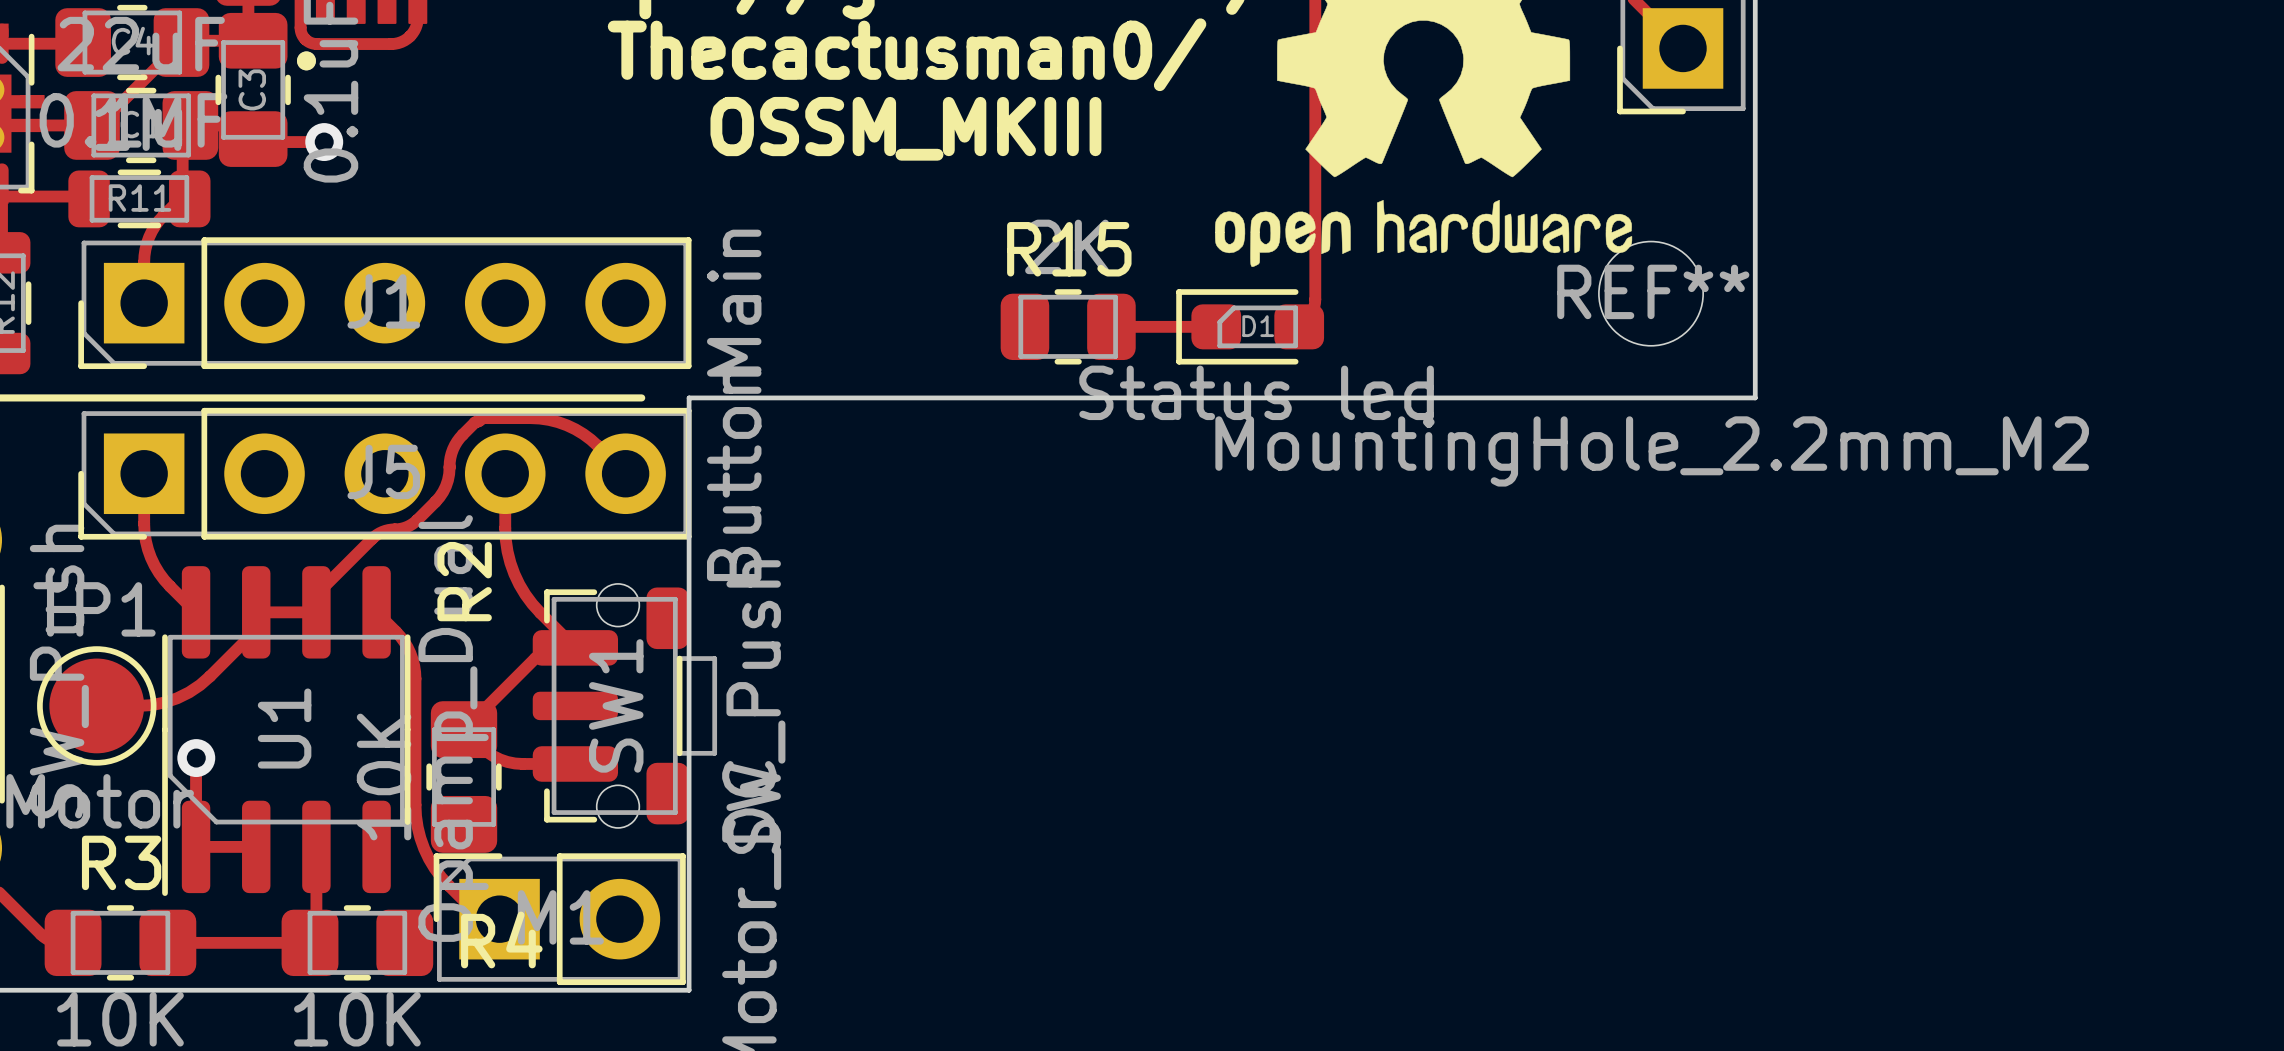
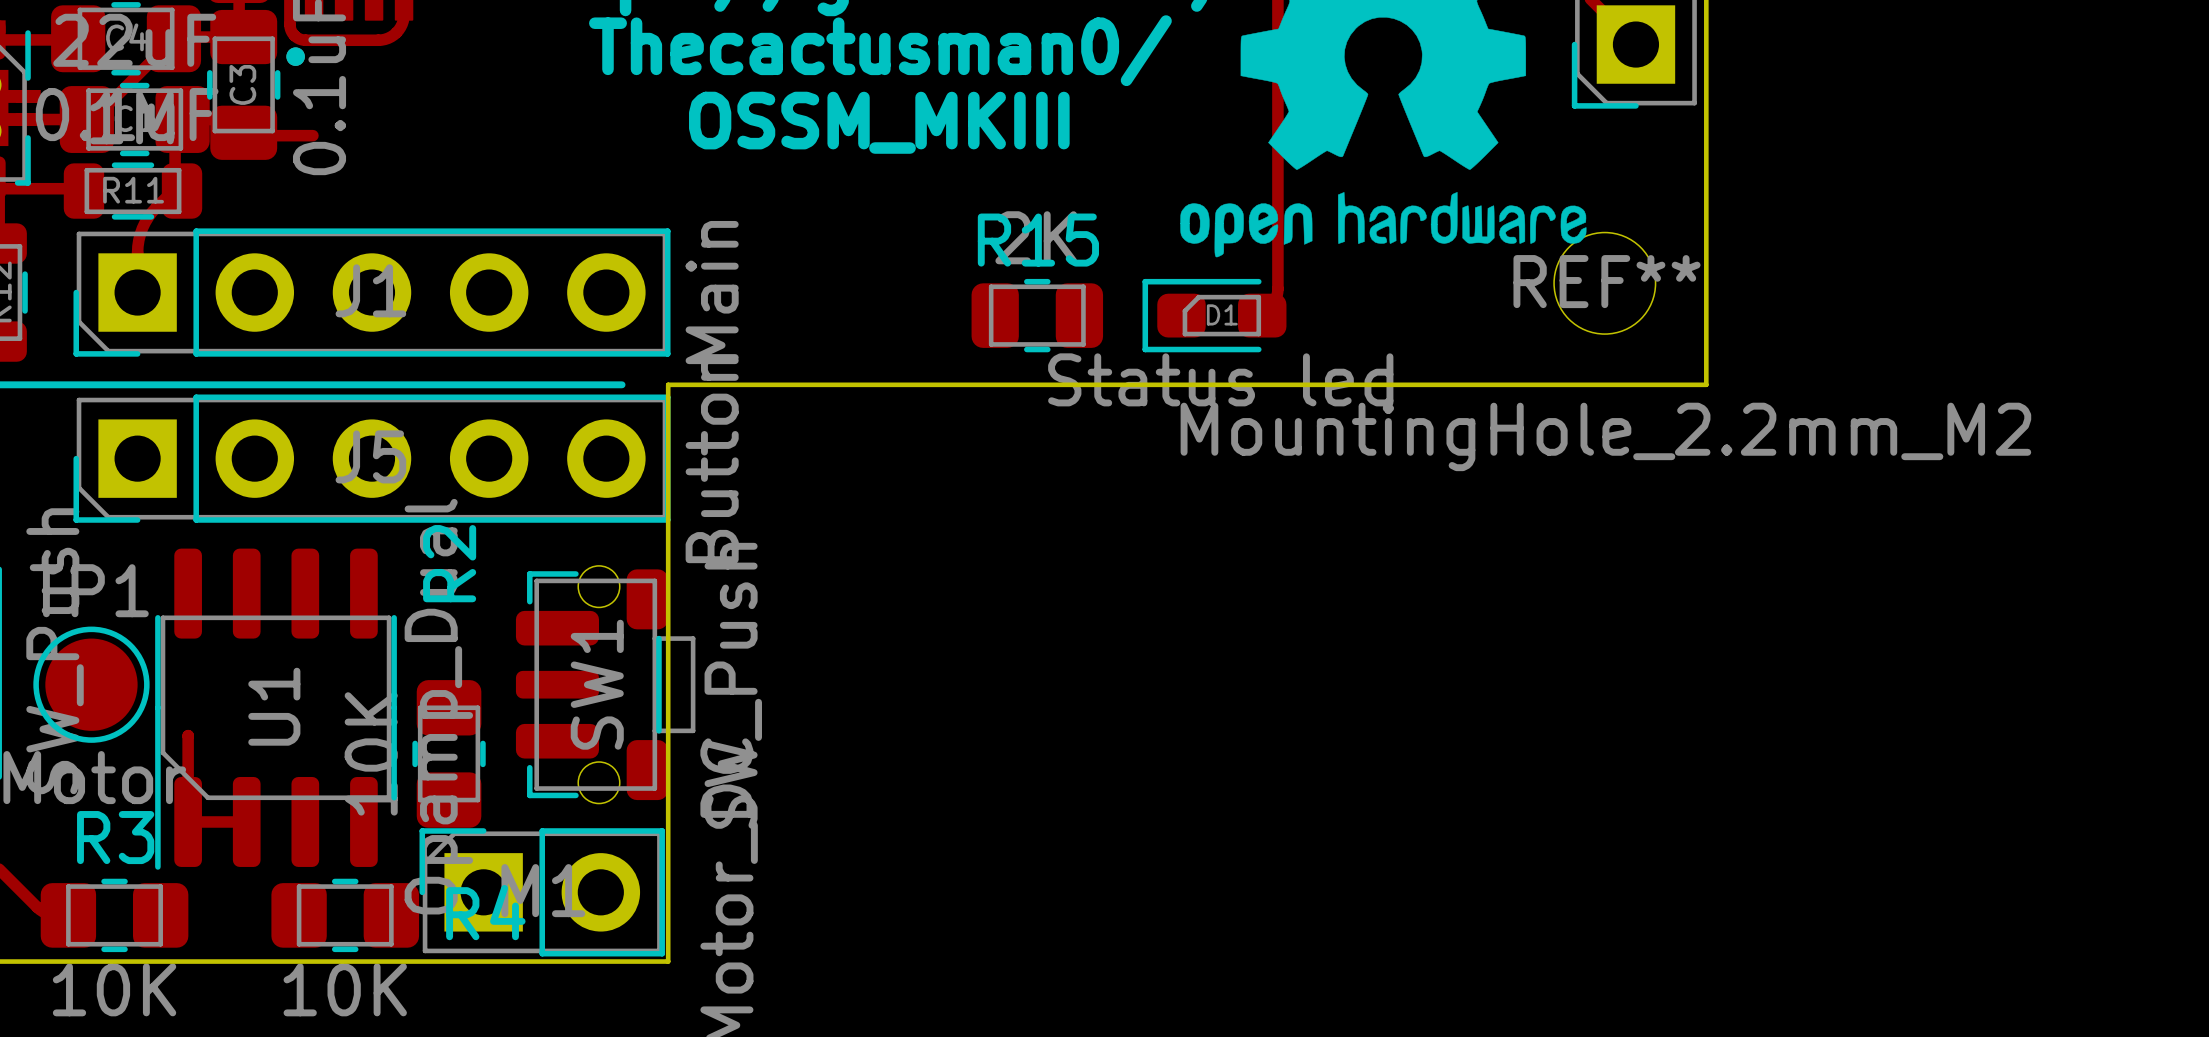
via: (324, 142) -> none
track: (1111, 326) (1216, 326) -> none
track: (144, 473) (144, 532) (150, 557) (164, 579) (196, 612) -> none
track: (505, 473) (505, 539) (514, 573) (532, 604) (564, 637) (566, 642) (562, 647) (550, 649) (537, 656) (464, 729) (486, 751) (507, 761) (522, 763) (575, 763) -> none
track: (625, 473) (590, 439) (566, 425) (539, 418) (482, 418) (474, 422) (454, 445) (450, 457) (445, 486) (435, 501) (409, 525) (385, 530) (374, 536) (321, 589) (312, 610) (307, 612) (260, 613) (249, 636) (200, 685) (177, 698) (151, 705) (96, 705) -> none
track: (376, 612) (404, 641) (414, 665) (416, 816) (424, 848) (441, 877) (476, 913) (484, 918) (499, 919) -> none
via: (196, 758) -> none
track: (316, 846) (316, 931) (310, 941) (167, 942) -> none

